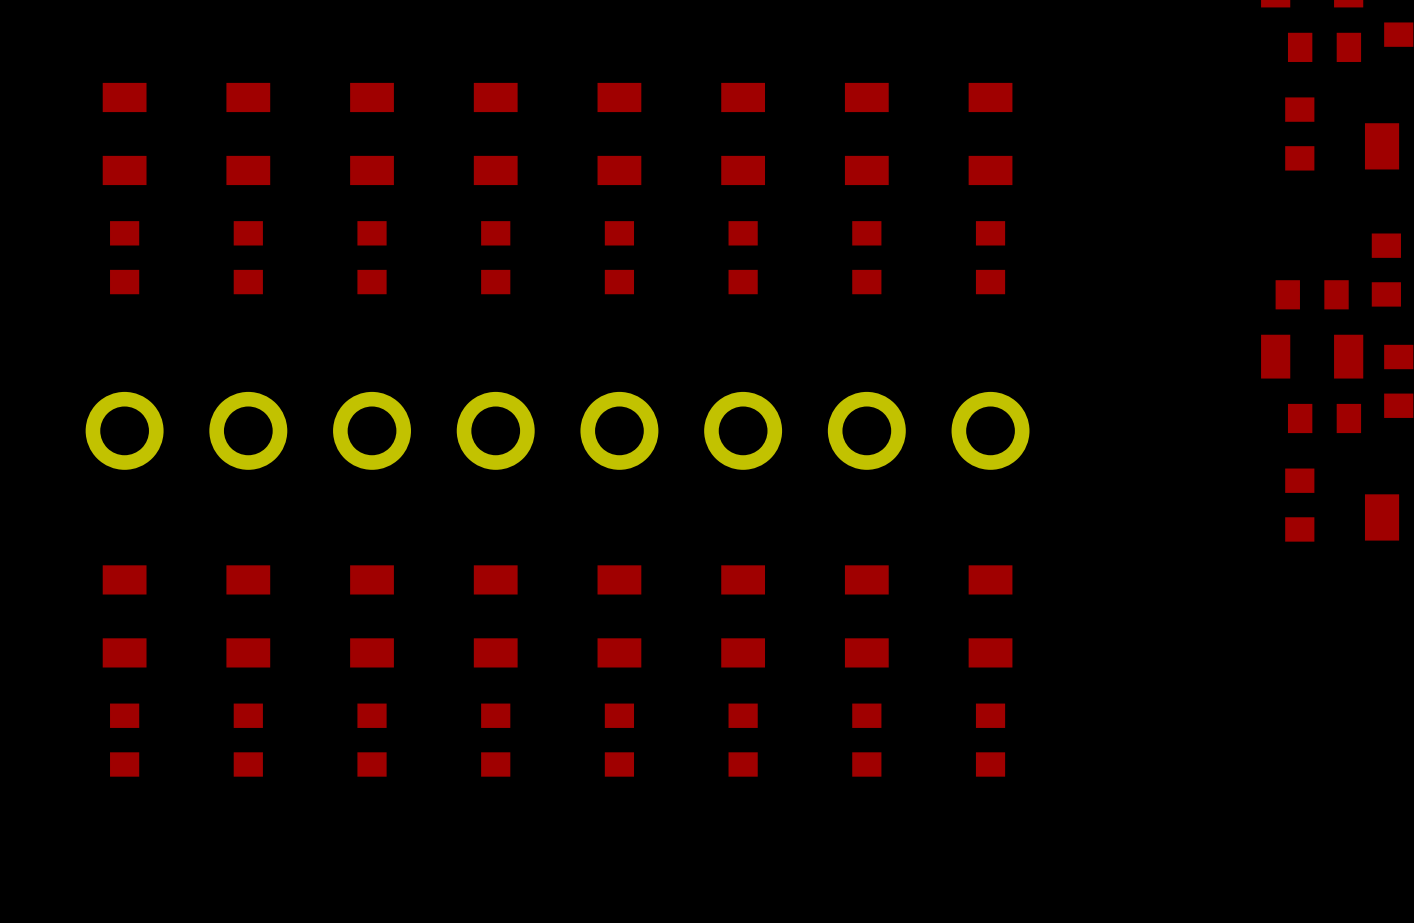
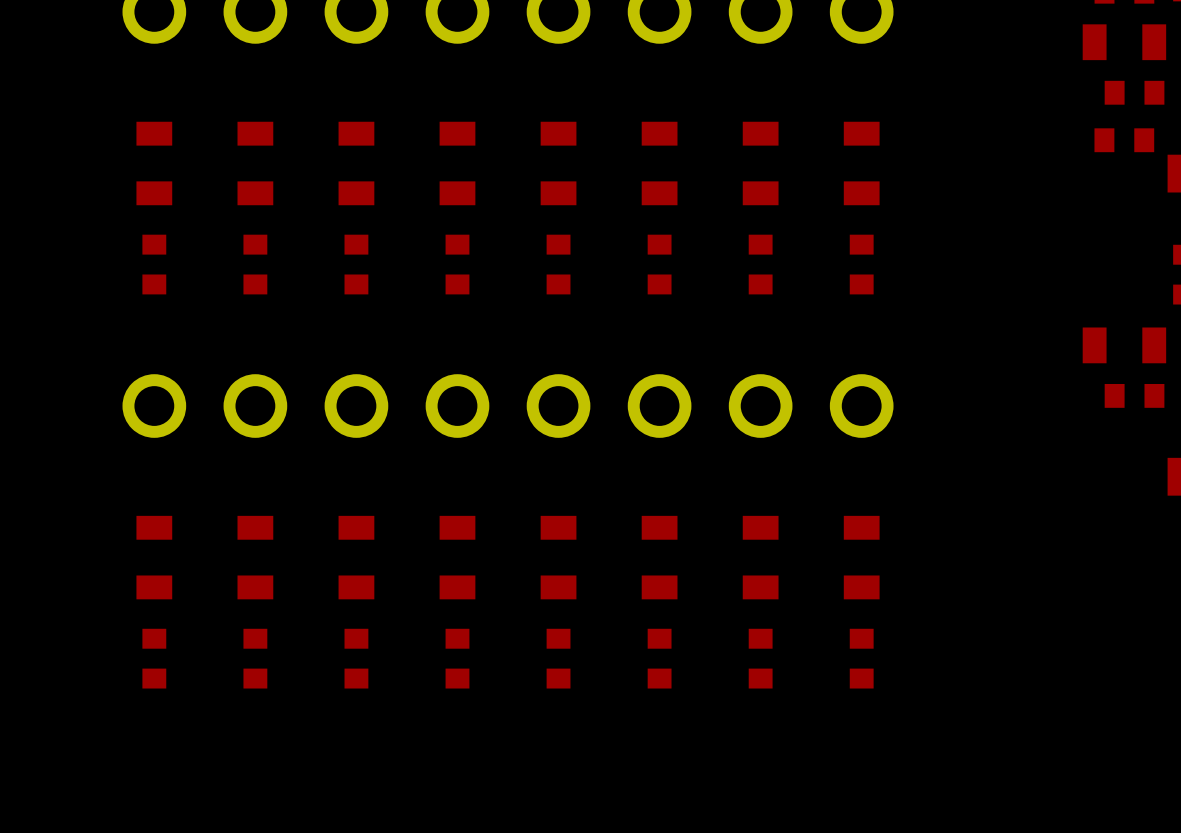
part rotation: 0° (1299, 133) -> 90° clockwise (1124, 140)
part: (1312, 294) -> none
part: (1299, 505) -> none

